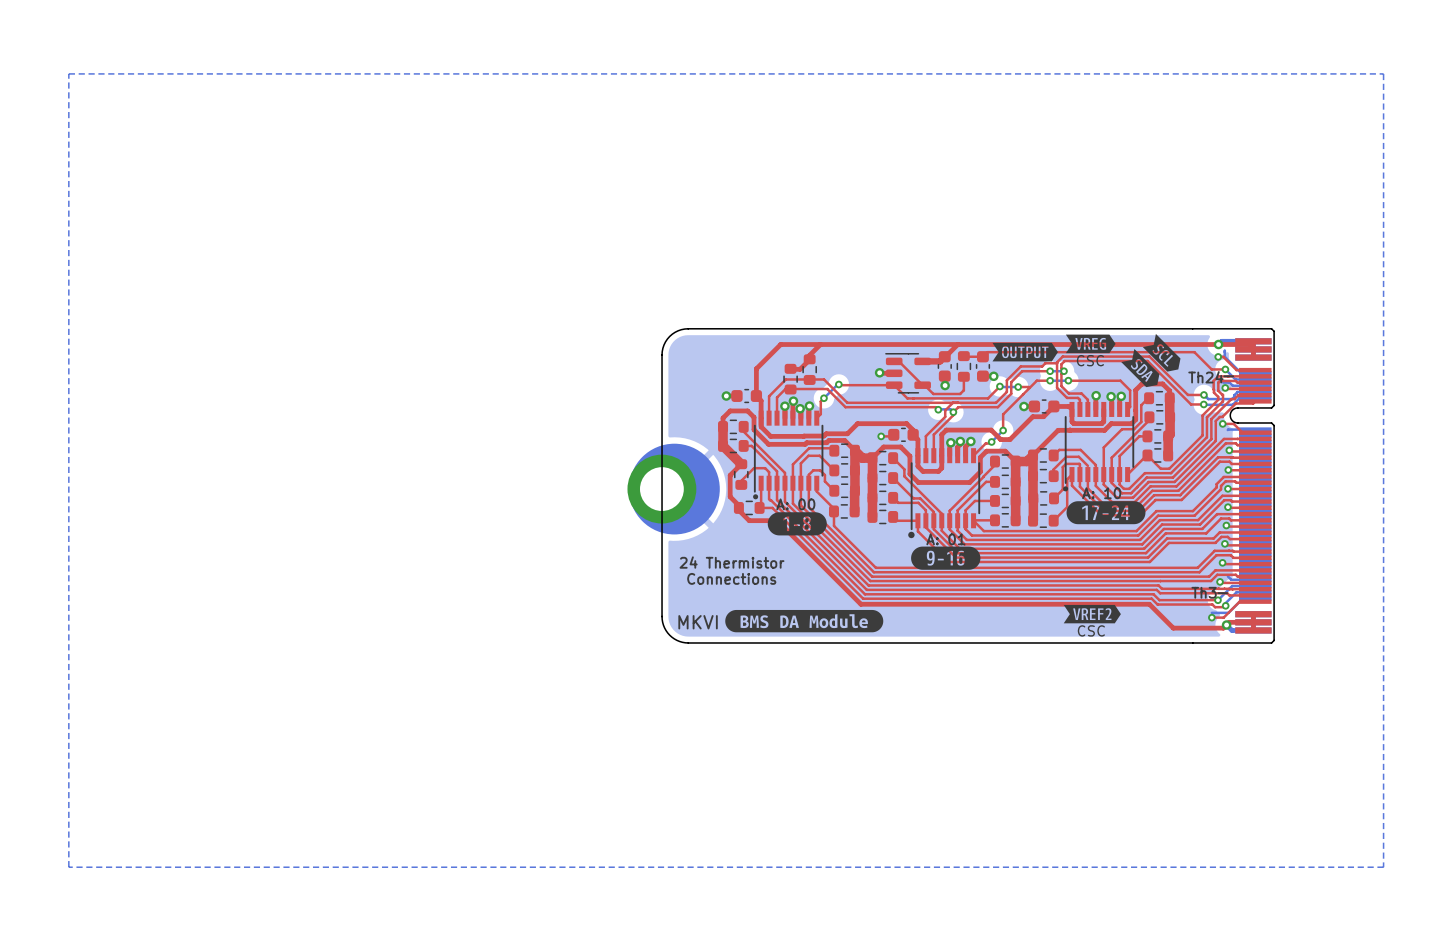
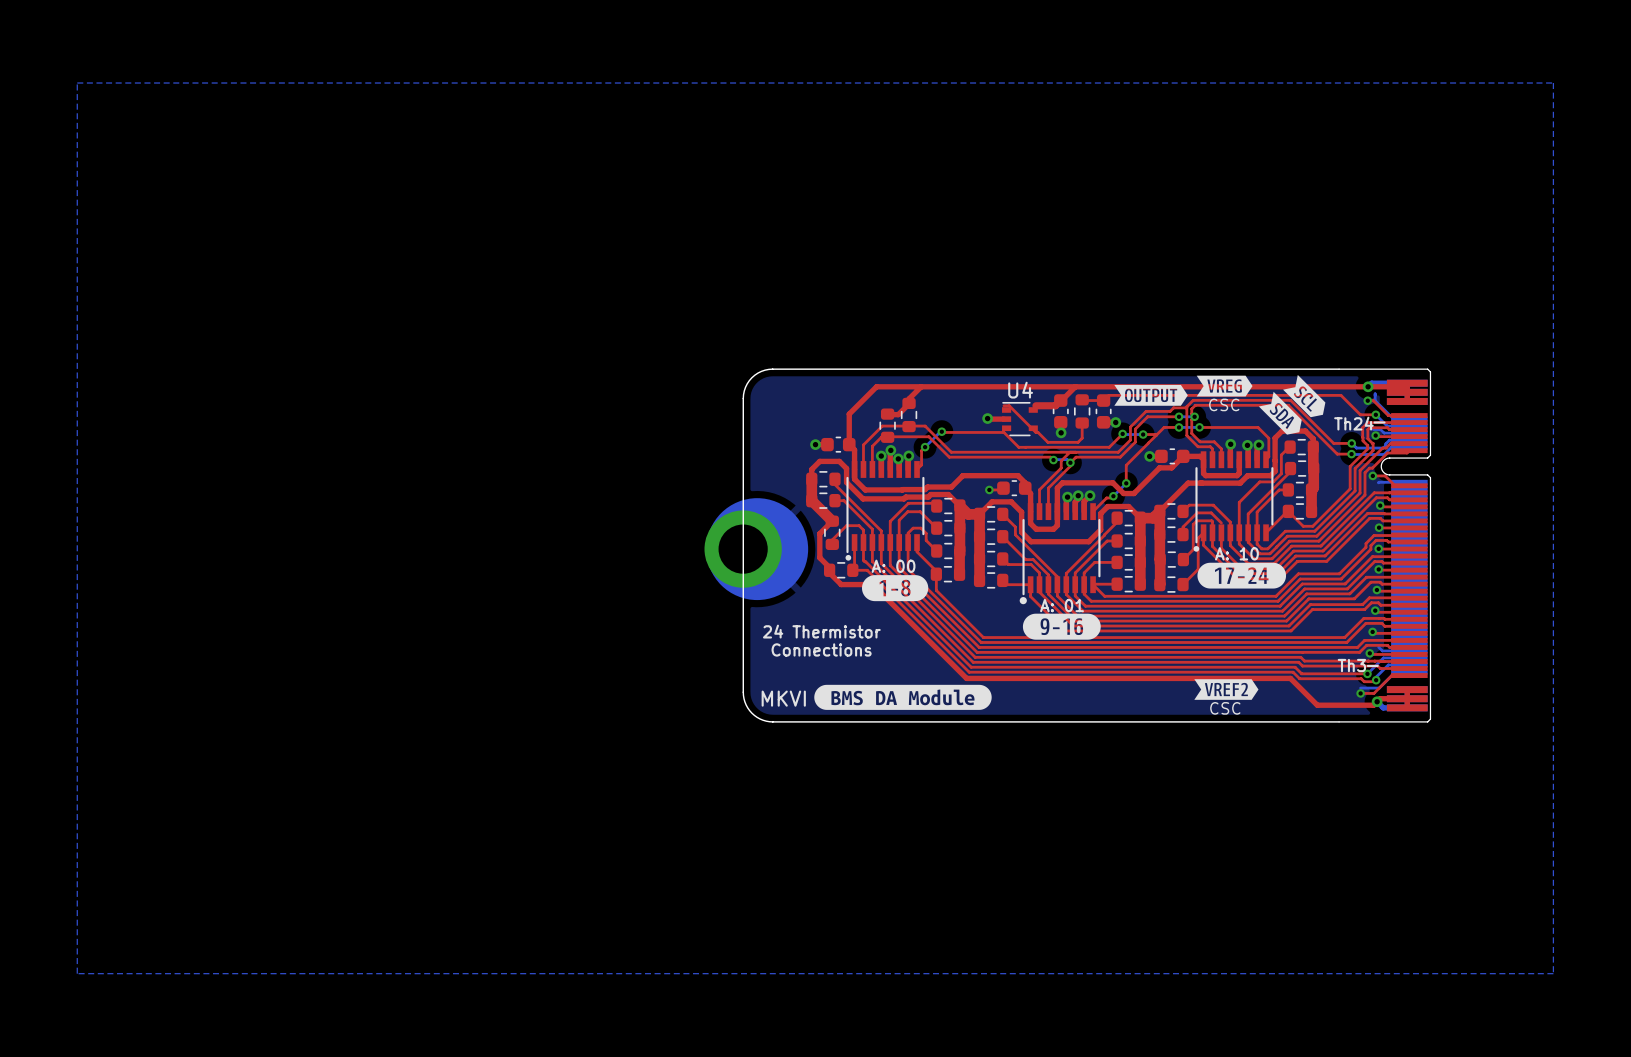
part: (908, 373) -> none
U4: none -> (1019, 419)

